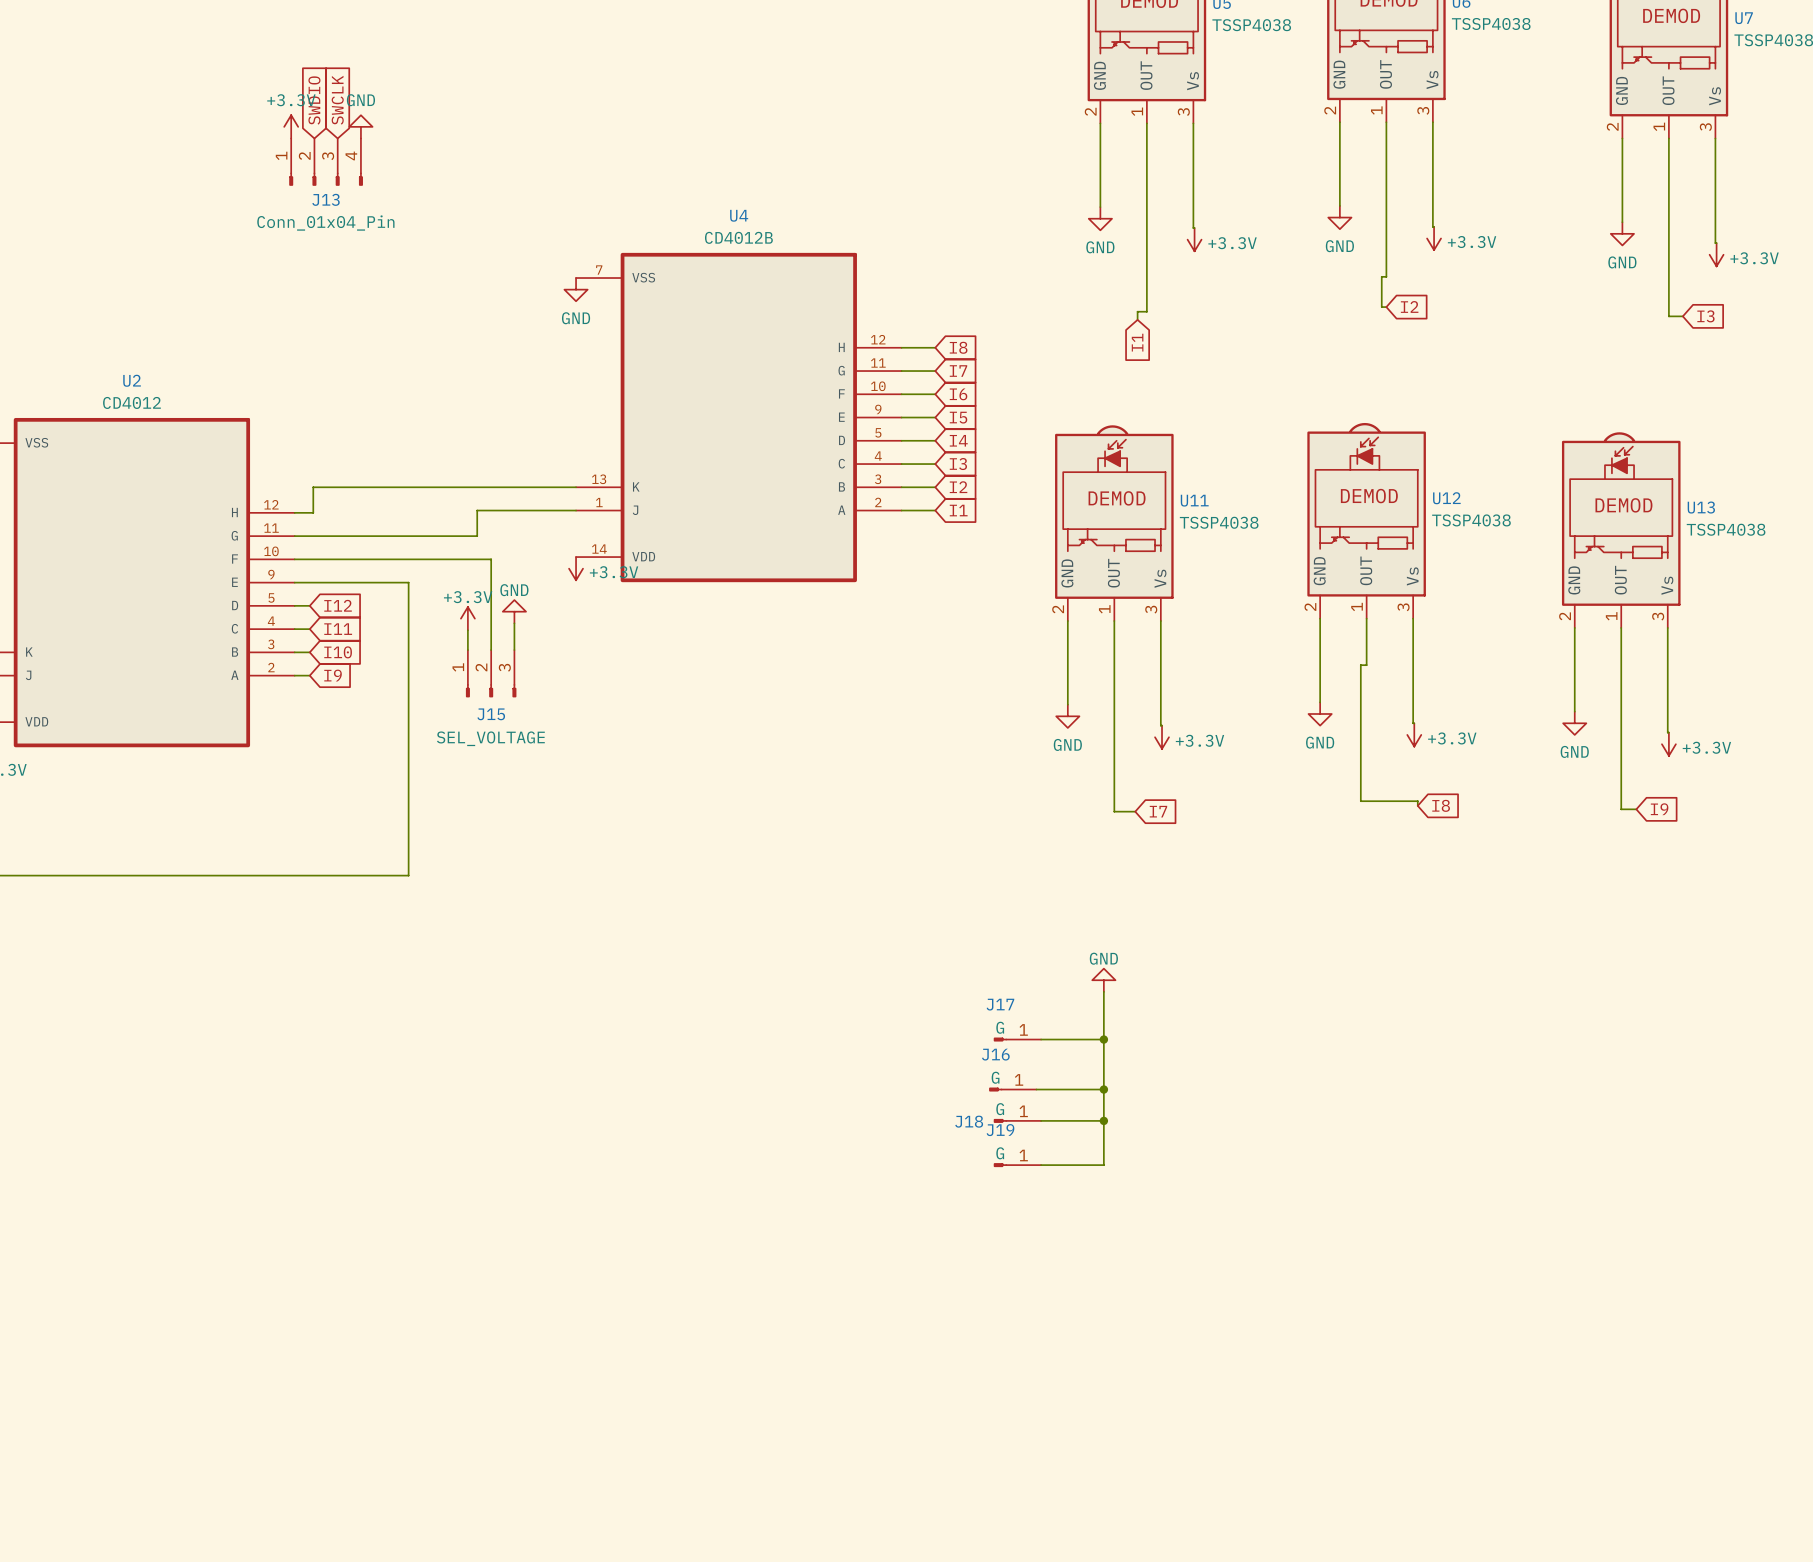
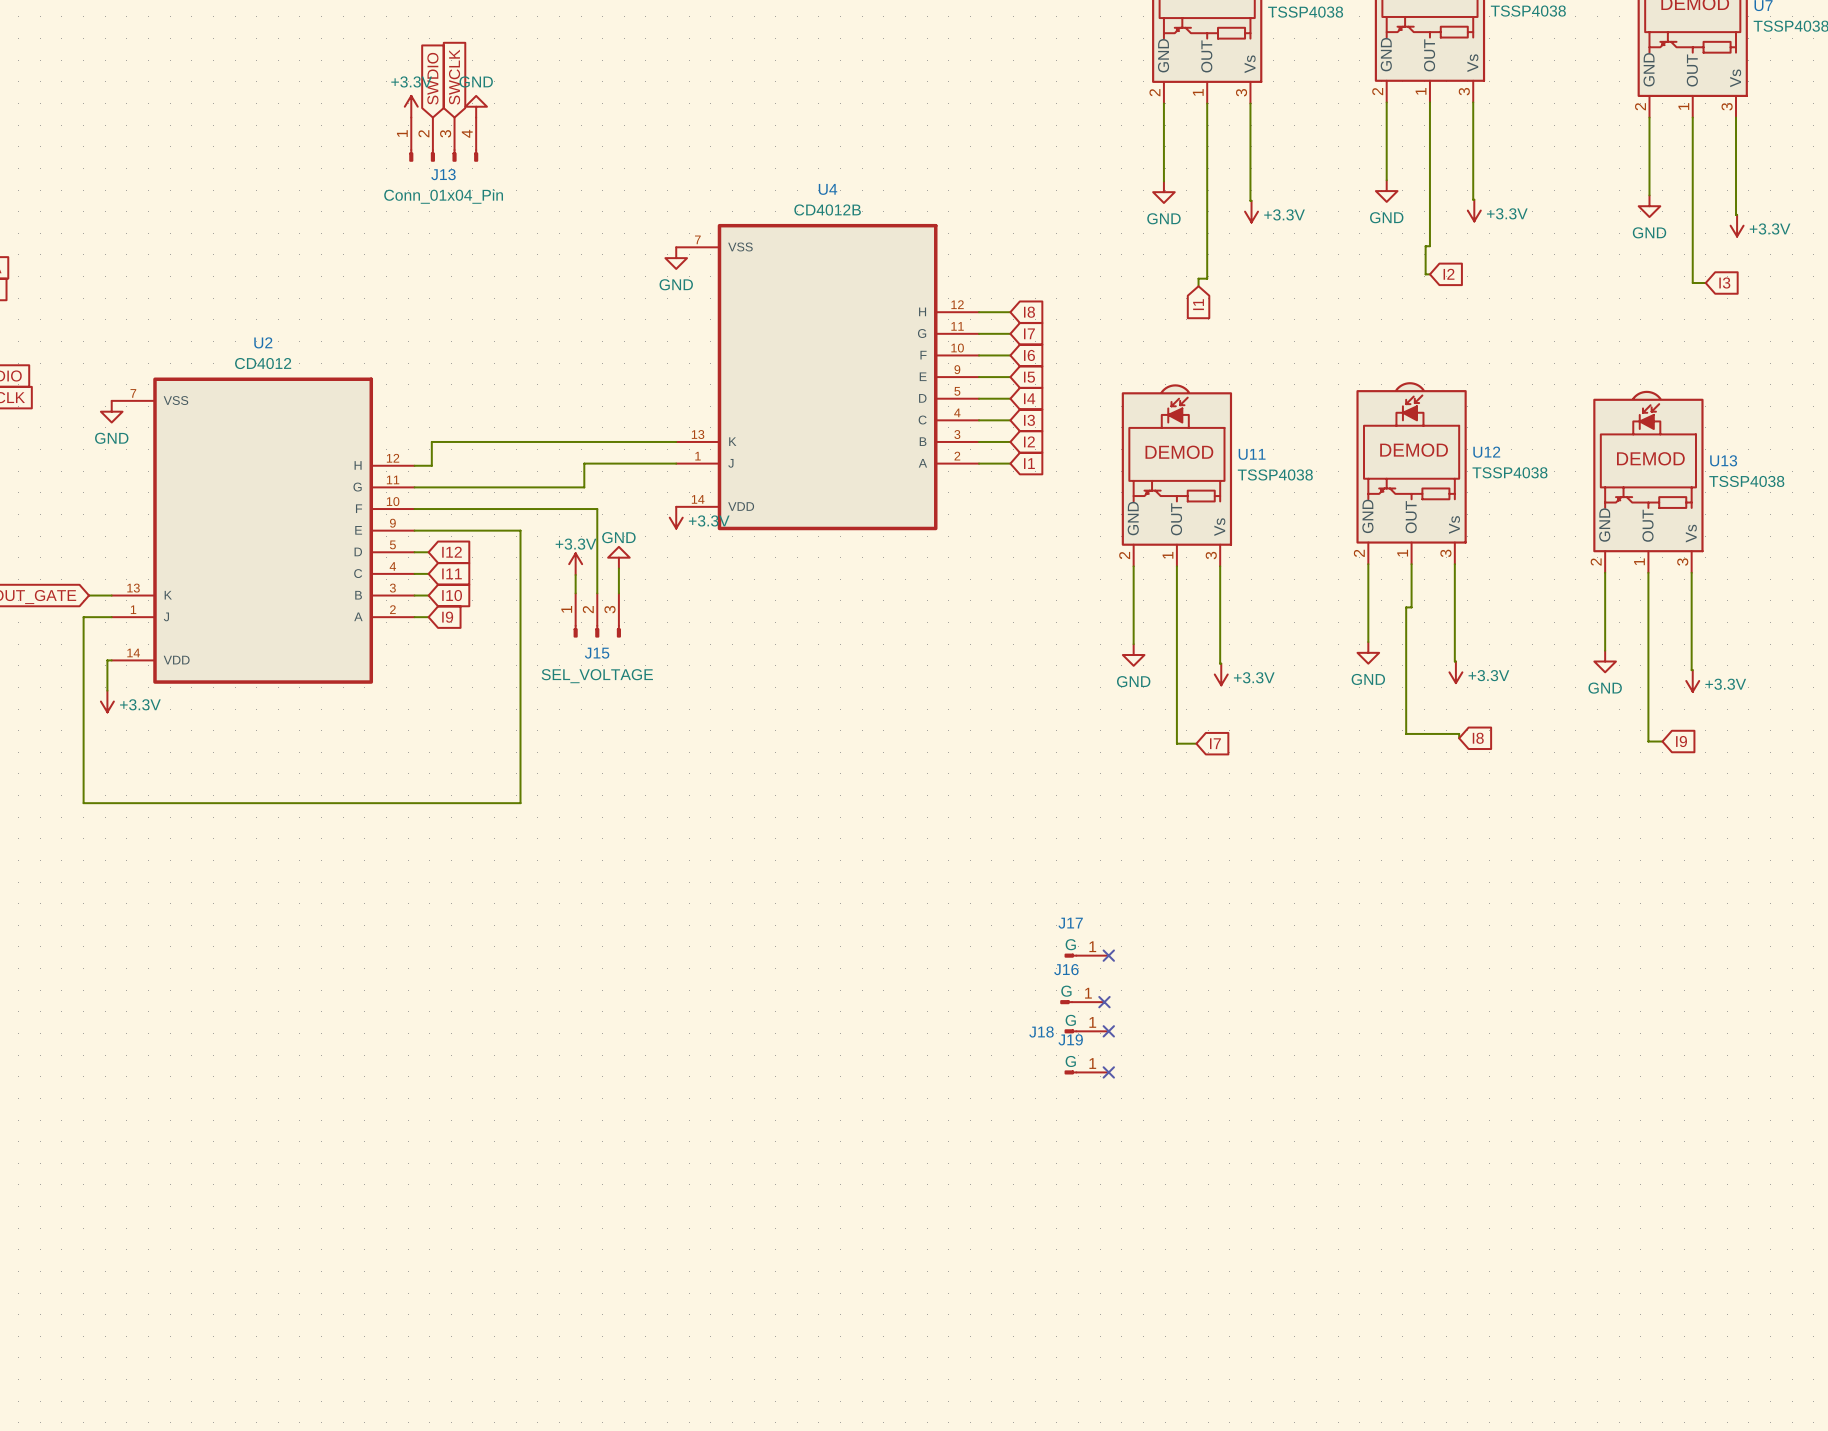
power symbol: GND (1103, 980) -> none
wire: (1103, 991) (1103, 1165) (1041, 1165) -> none
wire: (1041, 1039) (1103, 1039) -> none
no-connect mark: none -> (1108, 955)
junction: (1103, 1039) -> none
wire: (1036, 1089) (1103, 1089) -> none
no-connect mark: none -> (1104, 1002)
junction: (1103, 1089) -> none
wire: (1041, 1120) (1103, 1120) -> none
no-connect mark: none -> (1108, 1031)
junction: (1103, 1120) -> none
no-connect mark: none -> (1108, 1072)

